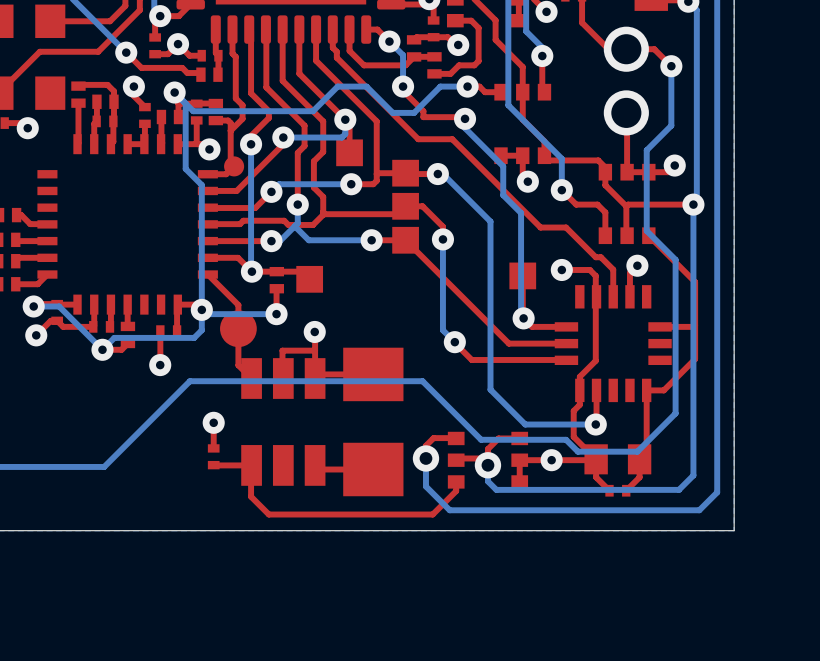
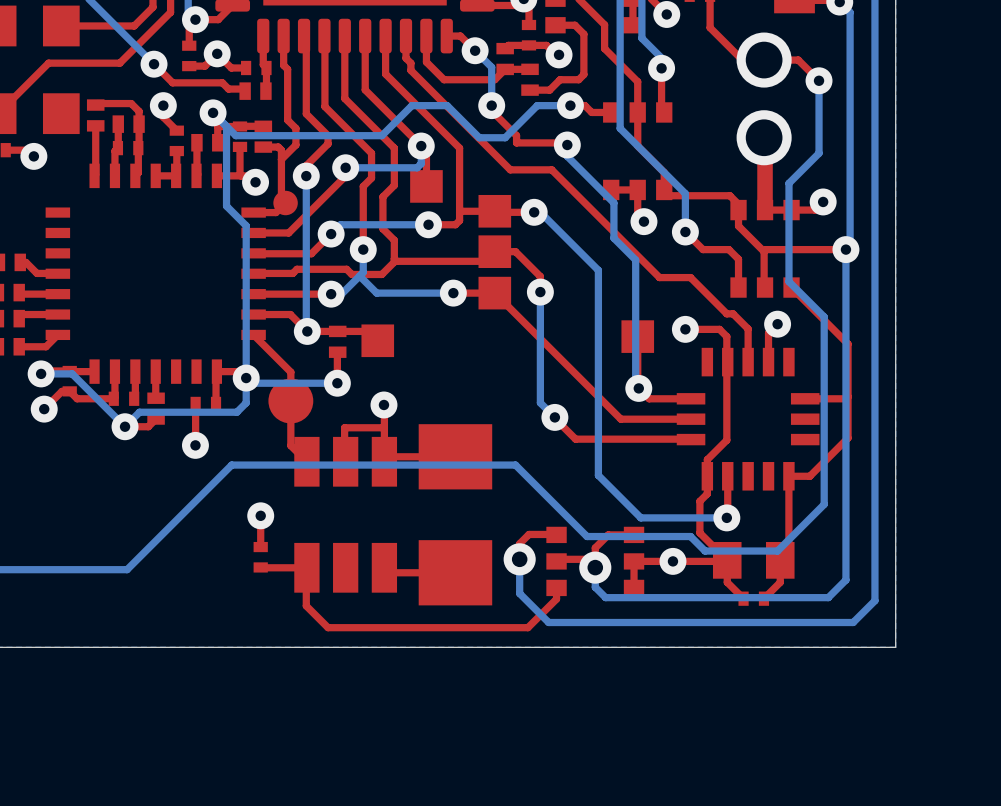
top track width: thin (627, 113) (627, 172) -> thick (765, 138) (765, 210)

